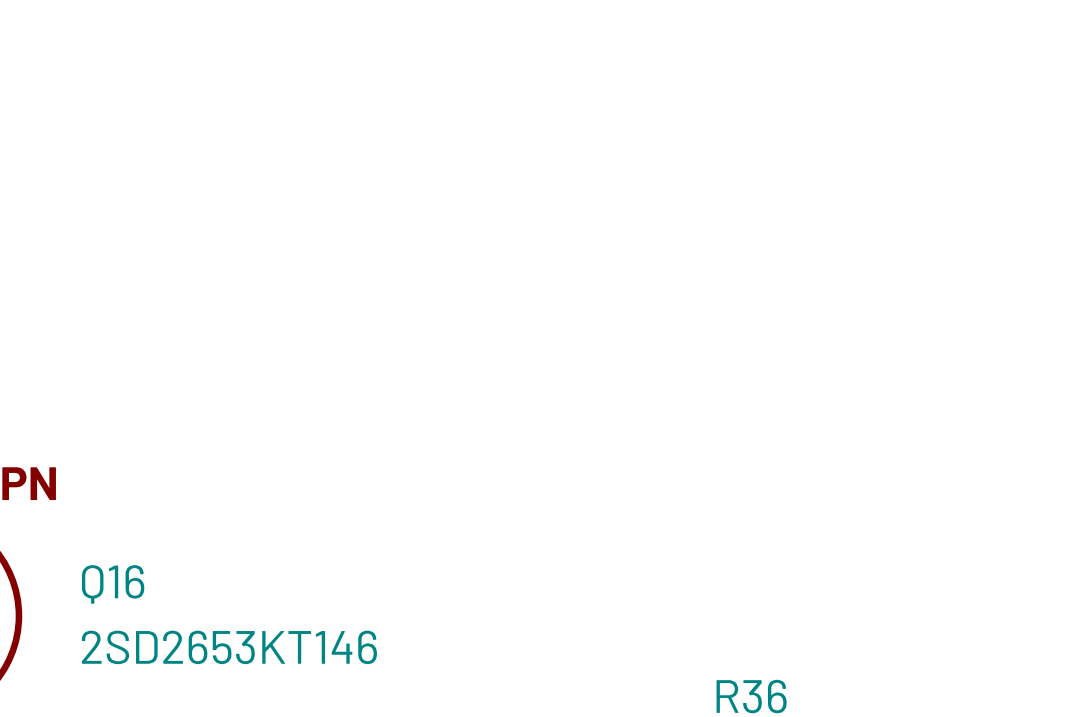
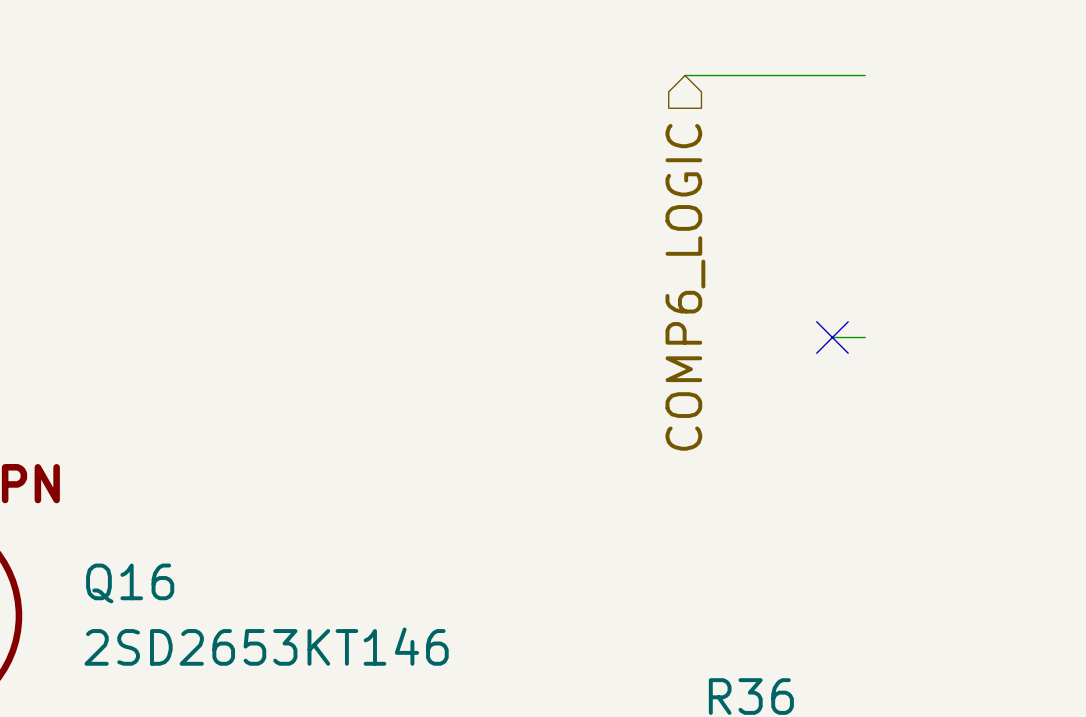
wire: none -> (685, 75) (865, 75)
hierarchical label: none -> COMP6_LOGIC (685, 287)
wire: none -> (832, 337) (865, 337)
no-connect mark: none -> (832, 337)

